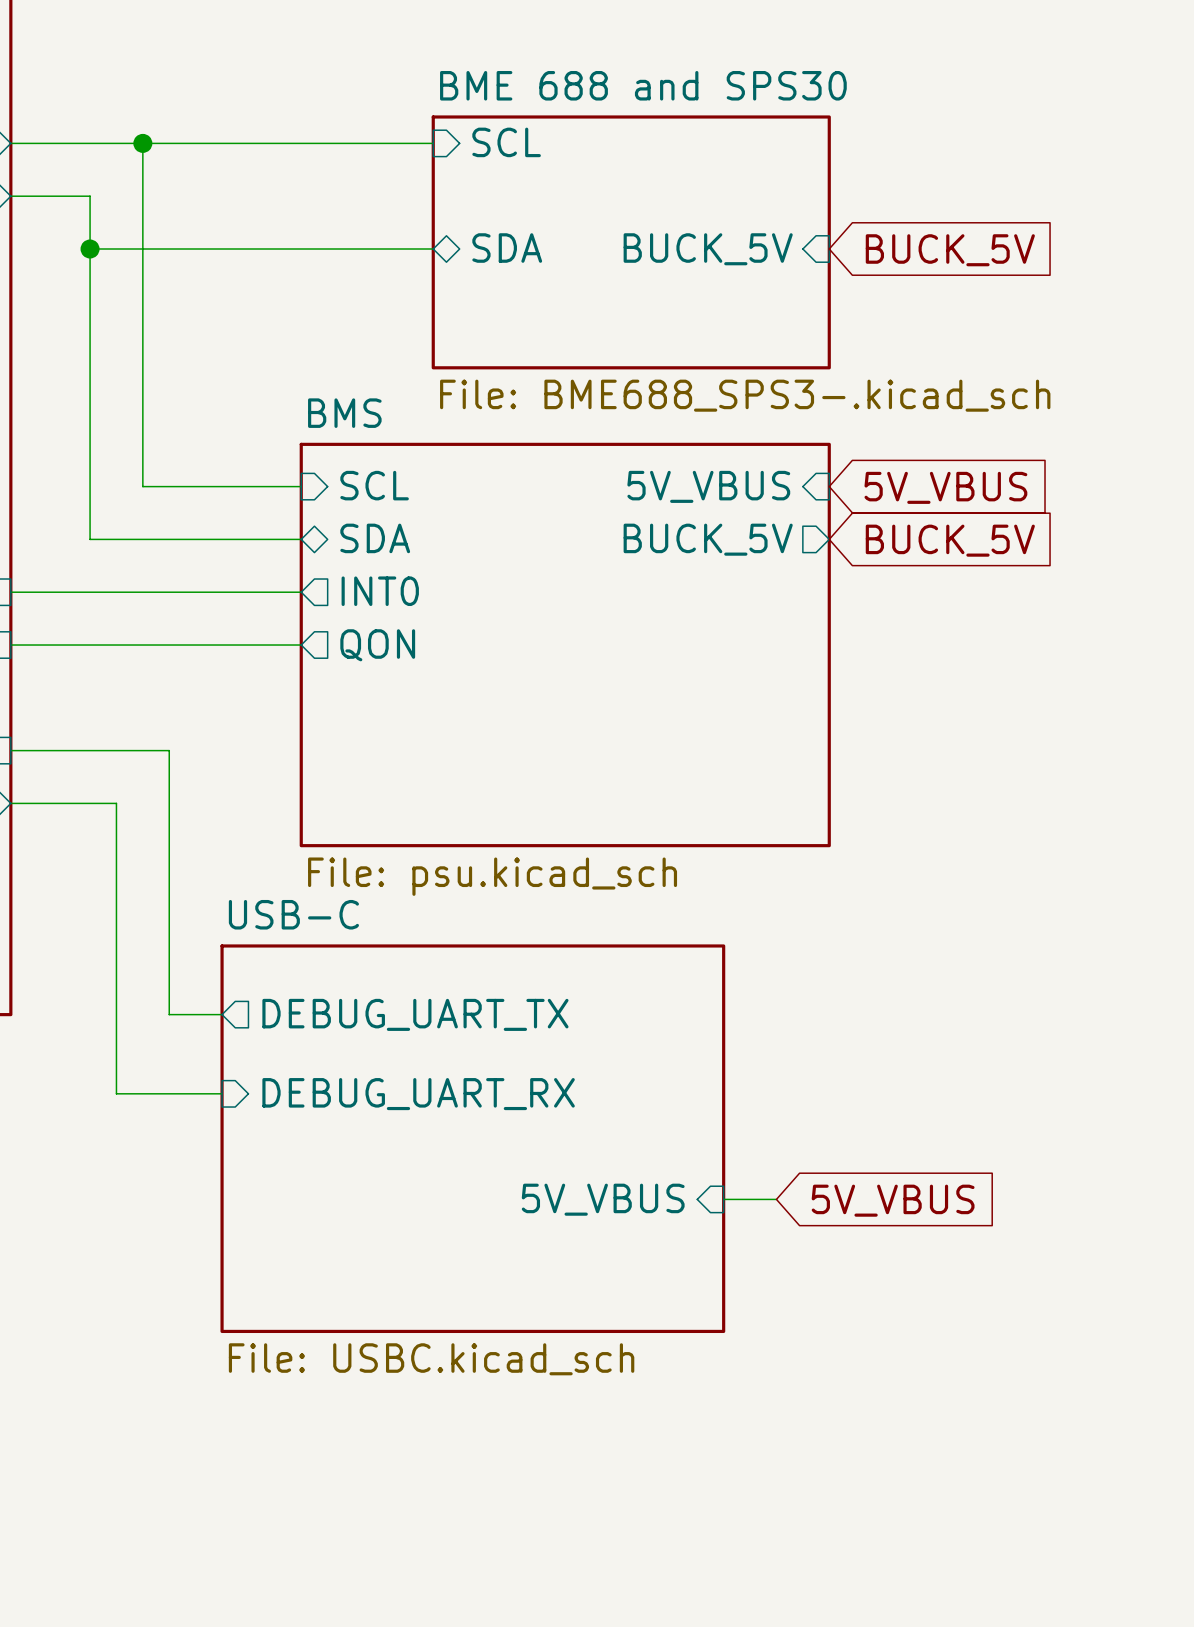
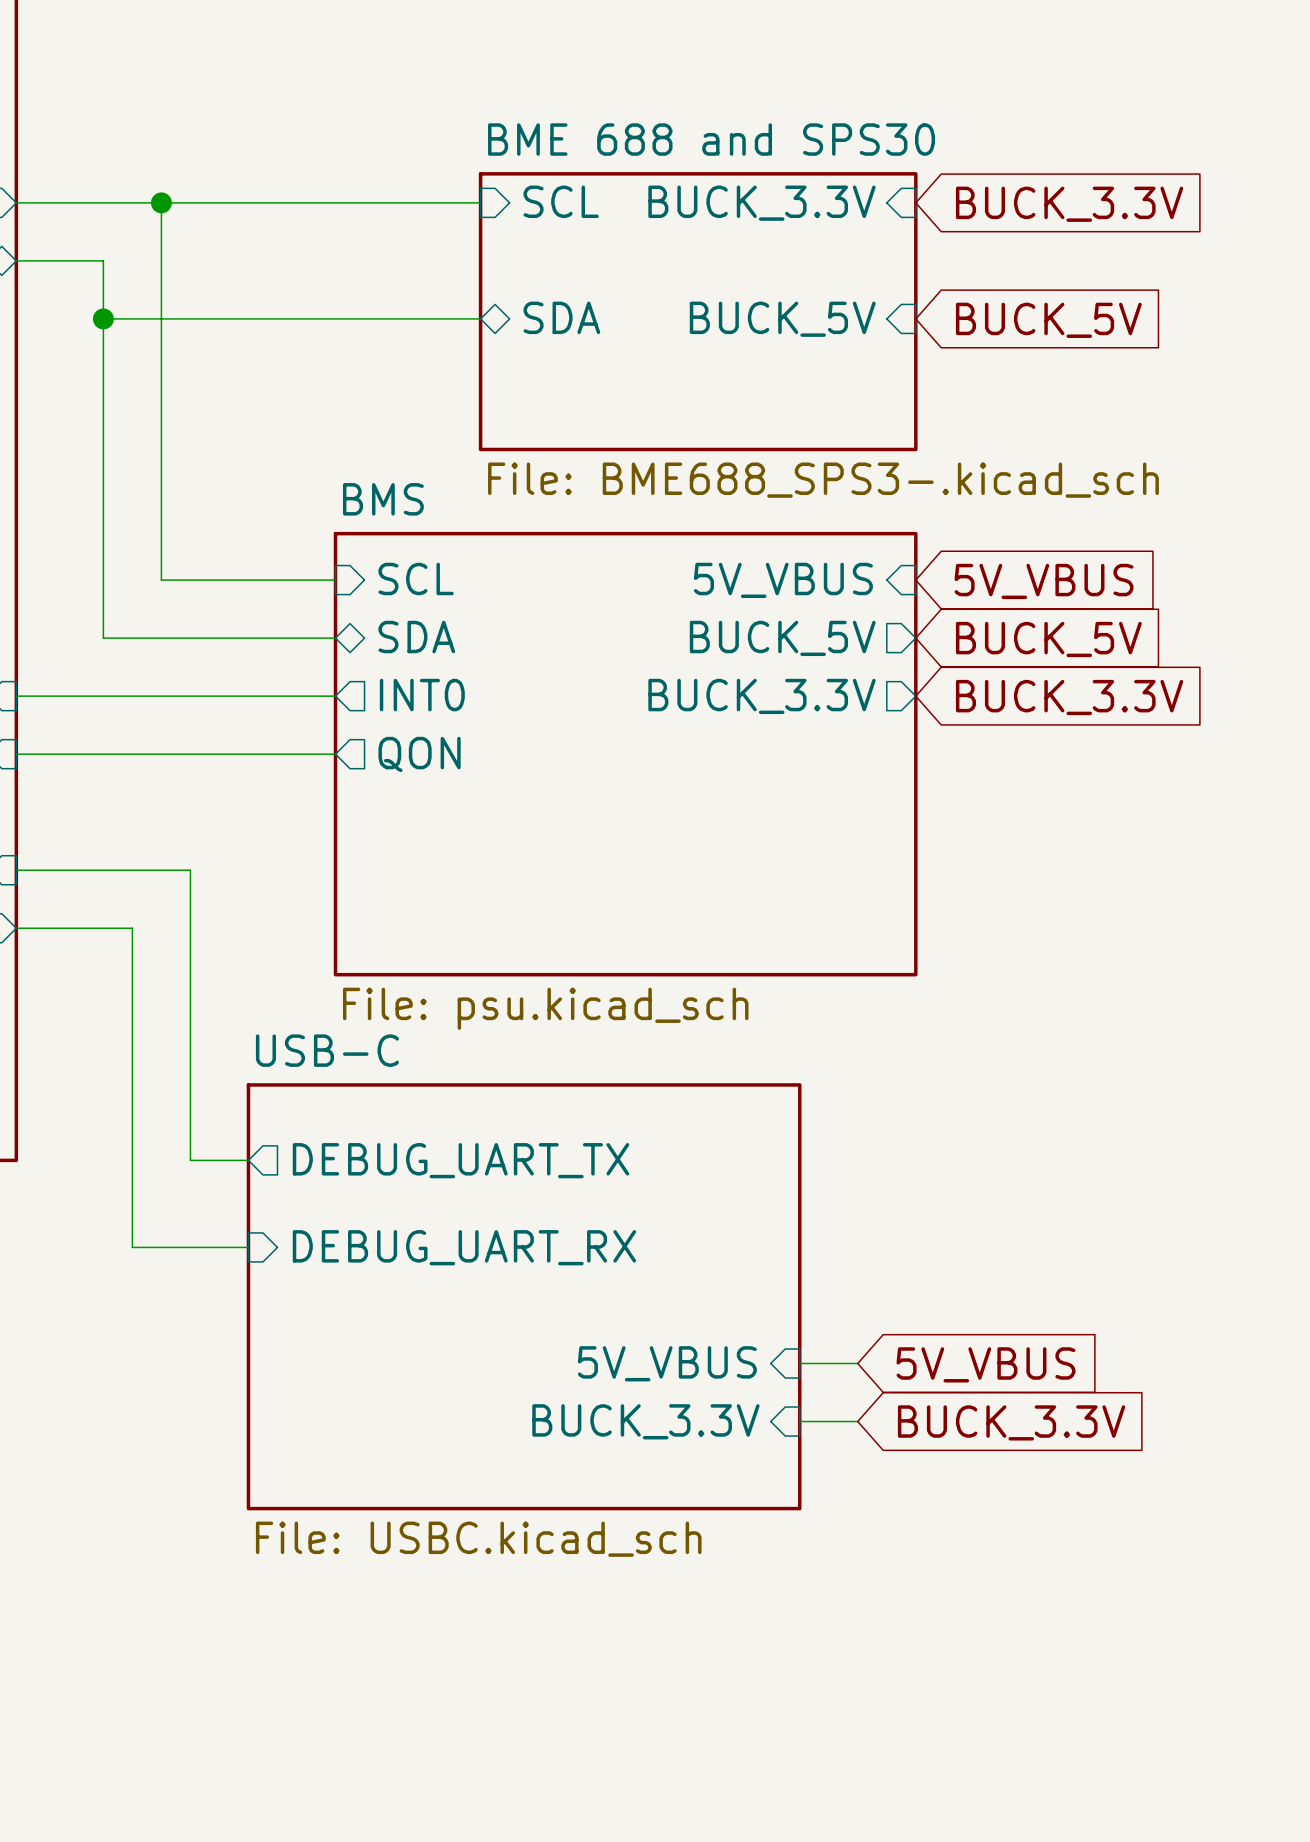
sheet pin: none -> BUCK_3.3V (761, 203)
global label: none -> BUCK_3.3V (1069, 204)
sheet pin: none -> BUCK_3.3V (761, 696)
global label: none -> BUCK_3.3V (1069, 697)
sheet pin: none -> BUCK_3.3V (645, 1421)
wire: none -> (799, 1421) (857, 1421)
global label: none -> BUCK_3.3V (1011, 1422)

